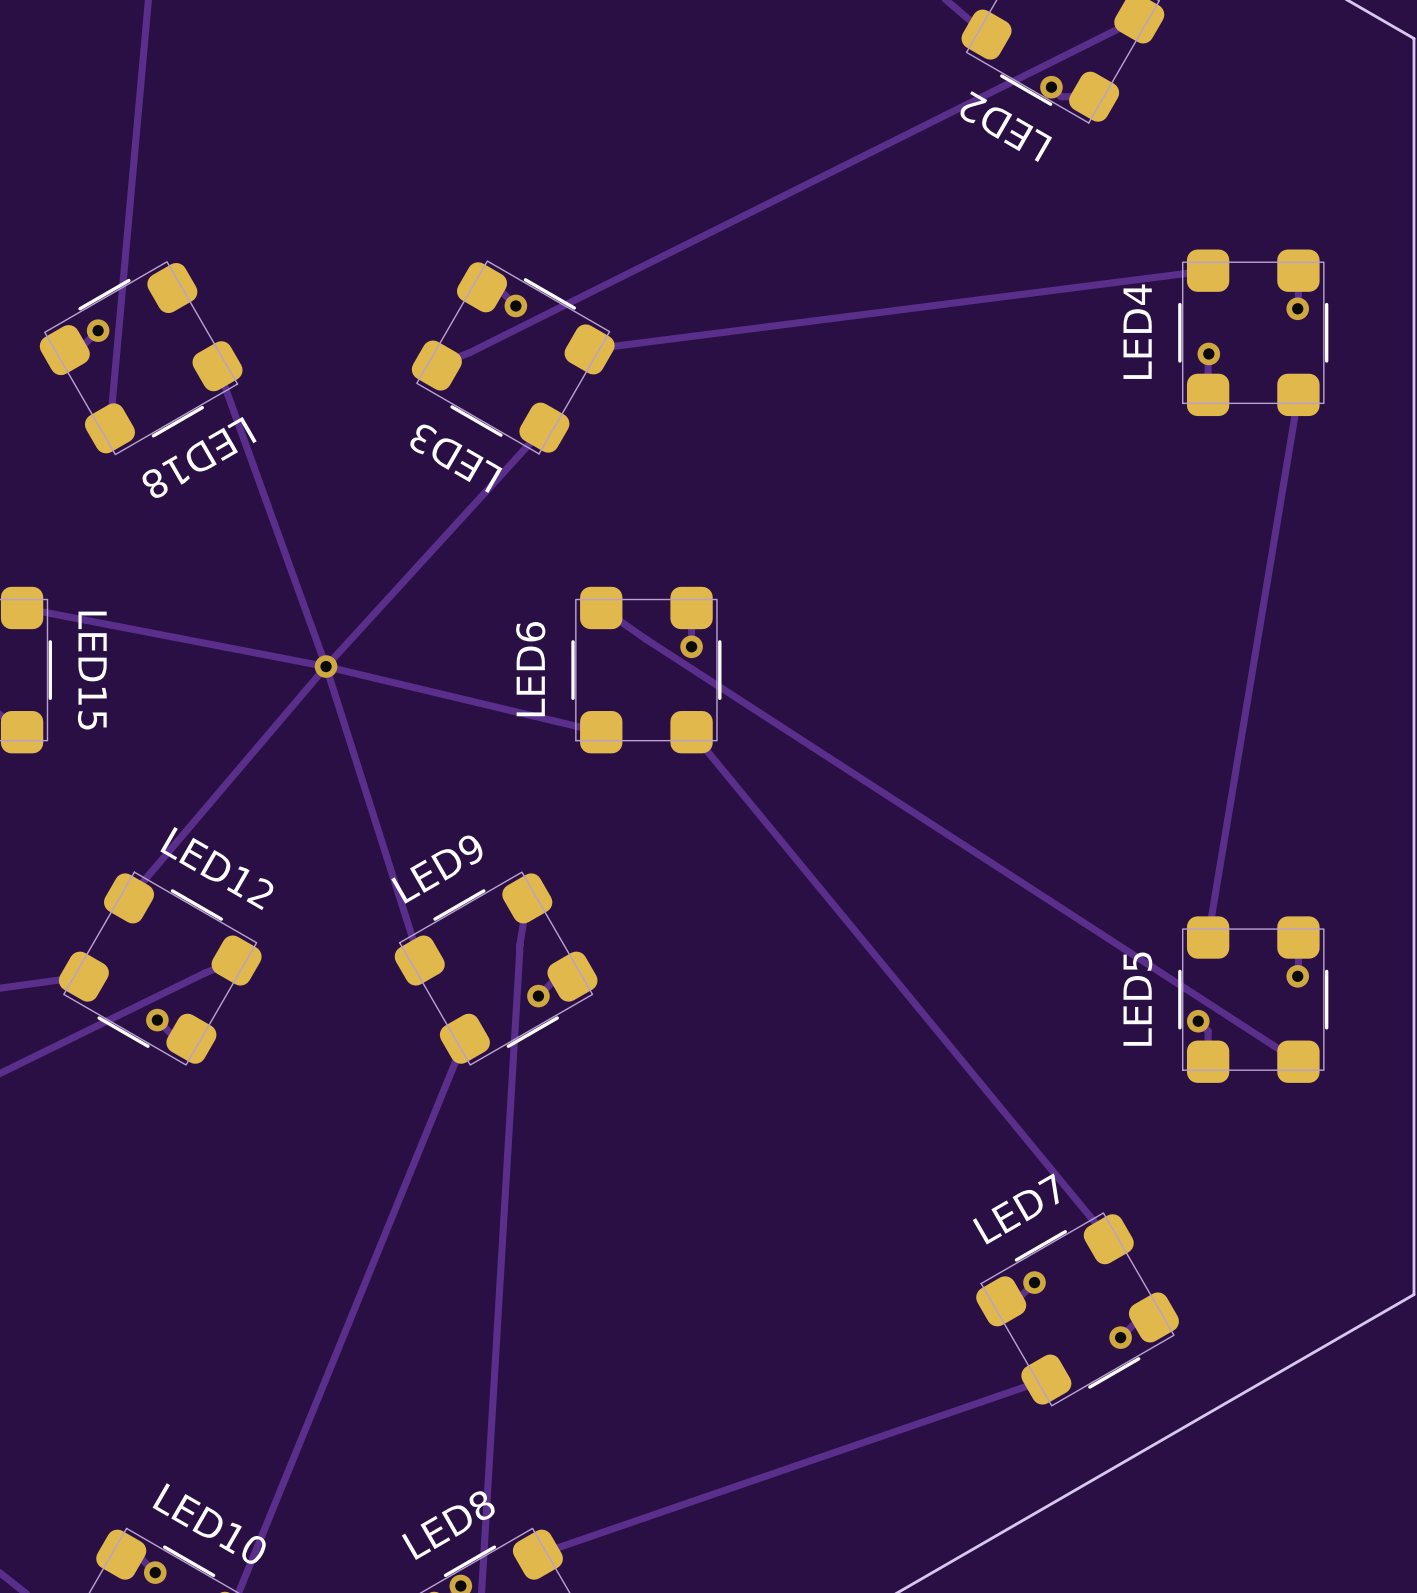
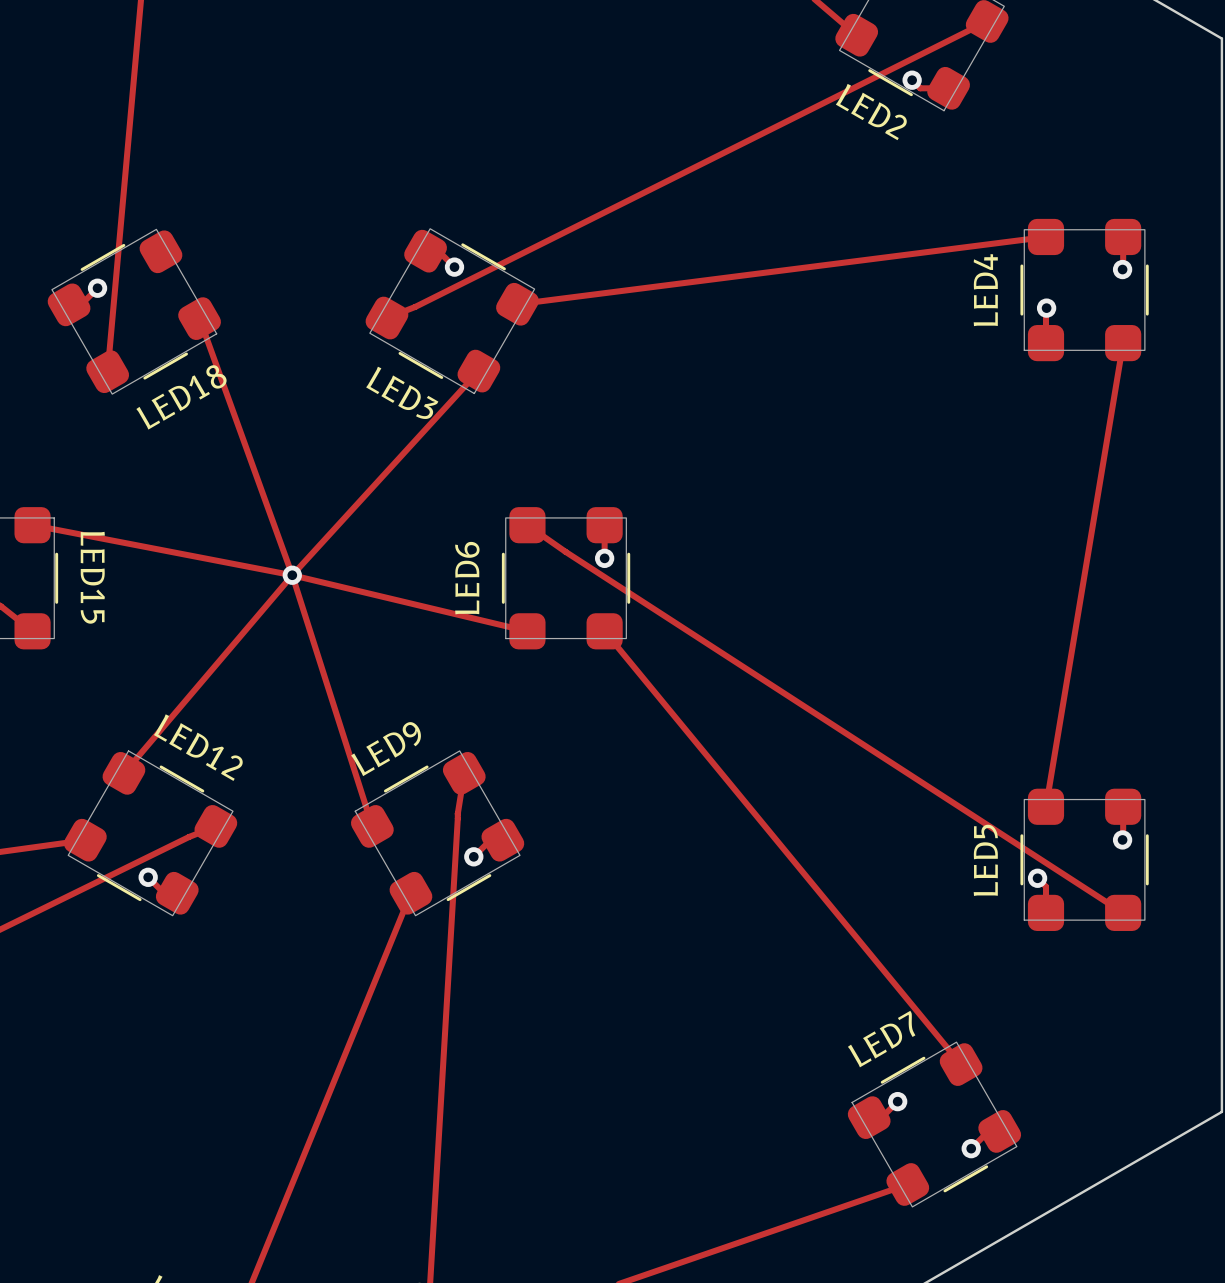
LED2 name rotation: 0° (1005, 126) -> 180° (871, 112)
LED18 name rotation: 0° (199, 457) -> 180° (181, 397)
LED3 name rotation: 0° (455, 458) -> 180° (402, 392)

